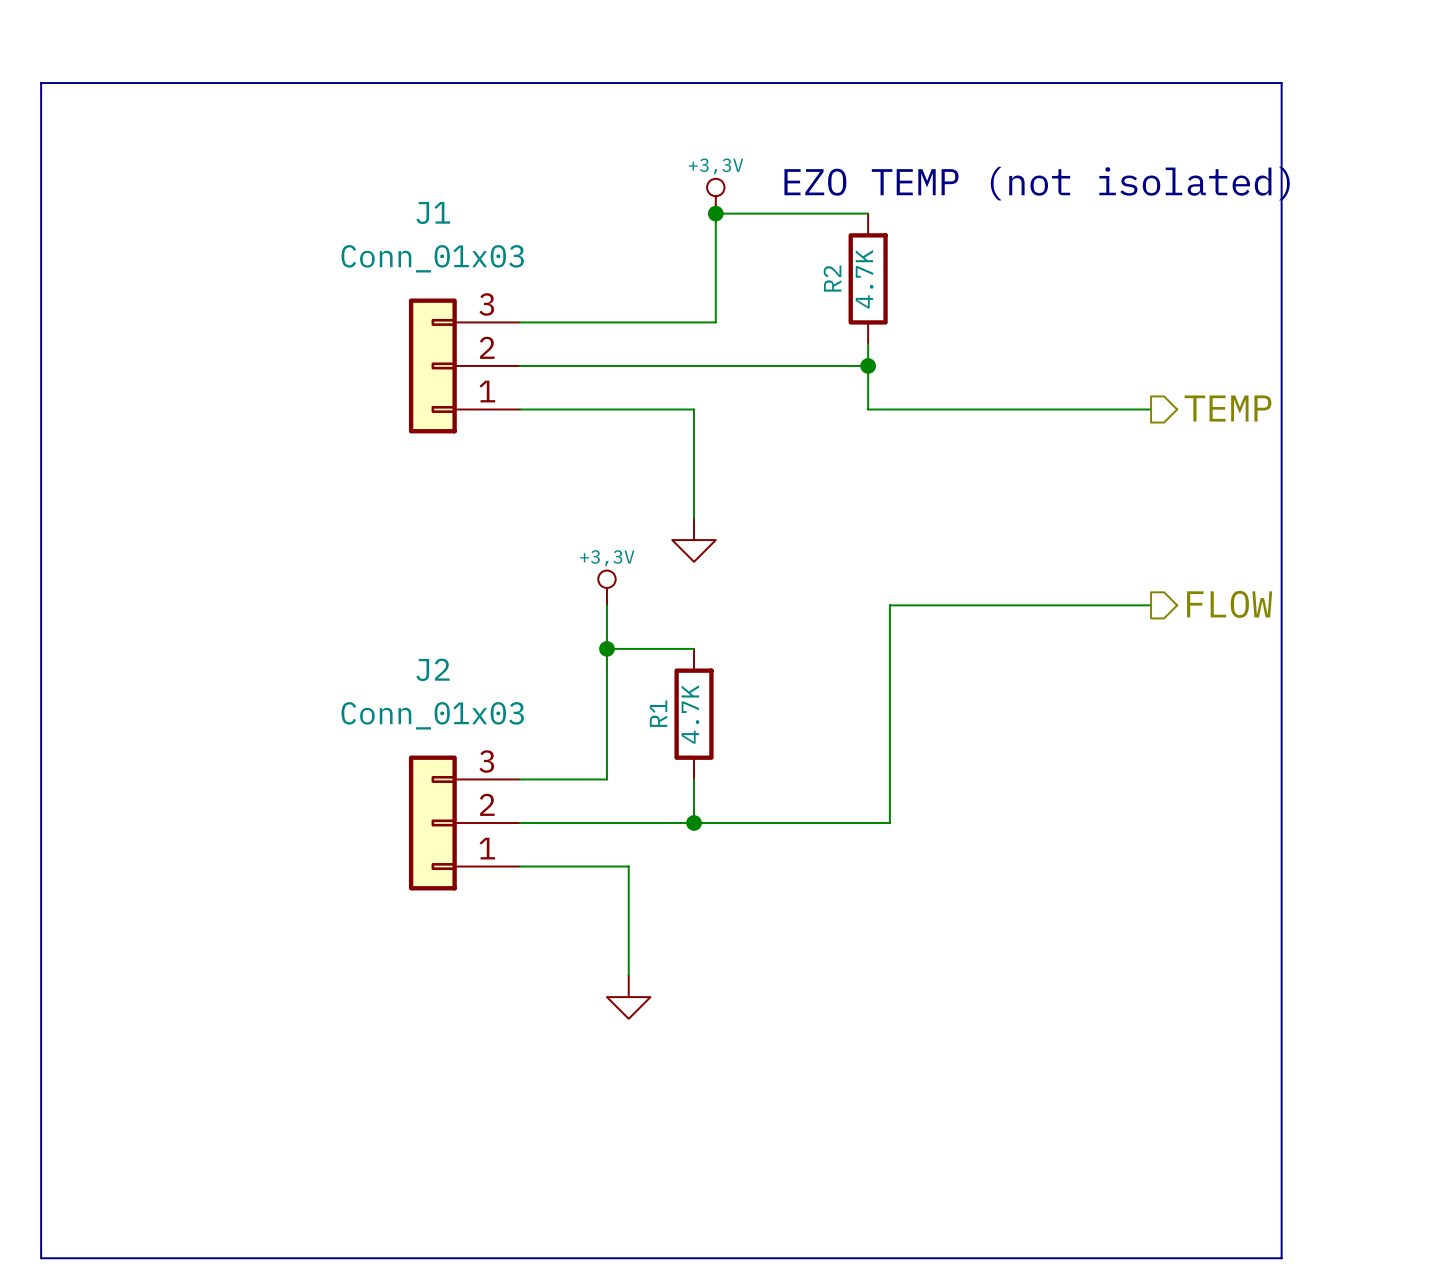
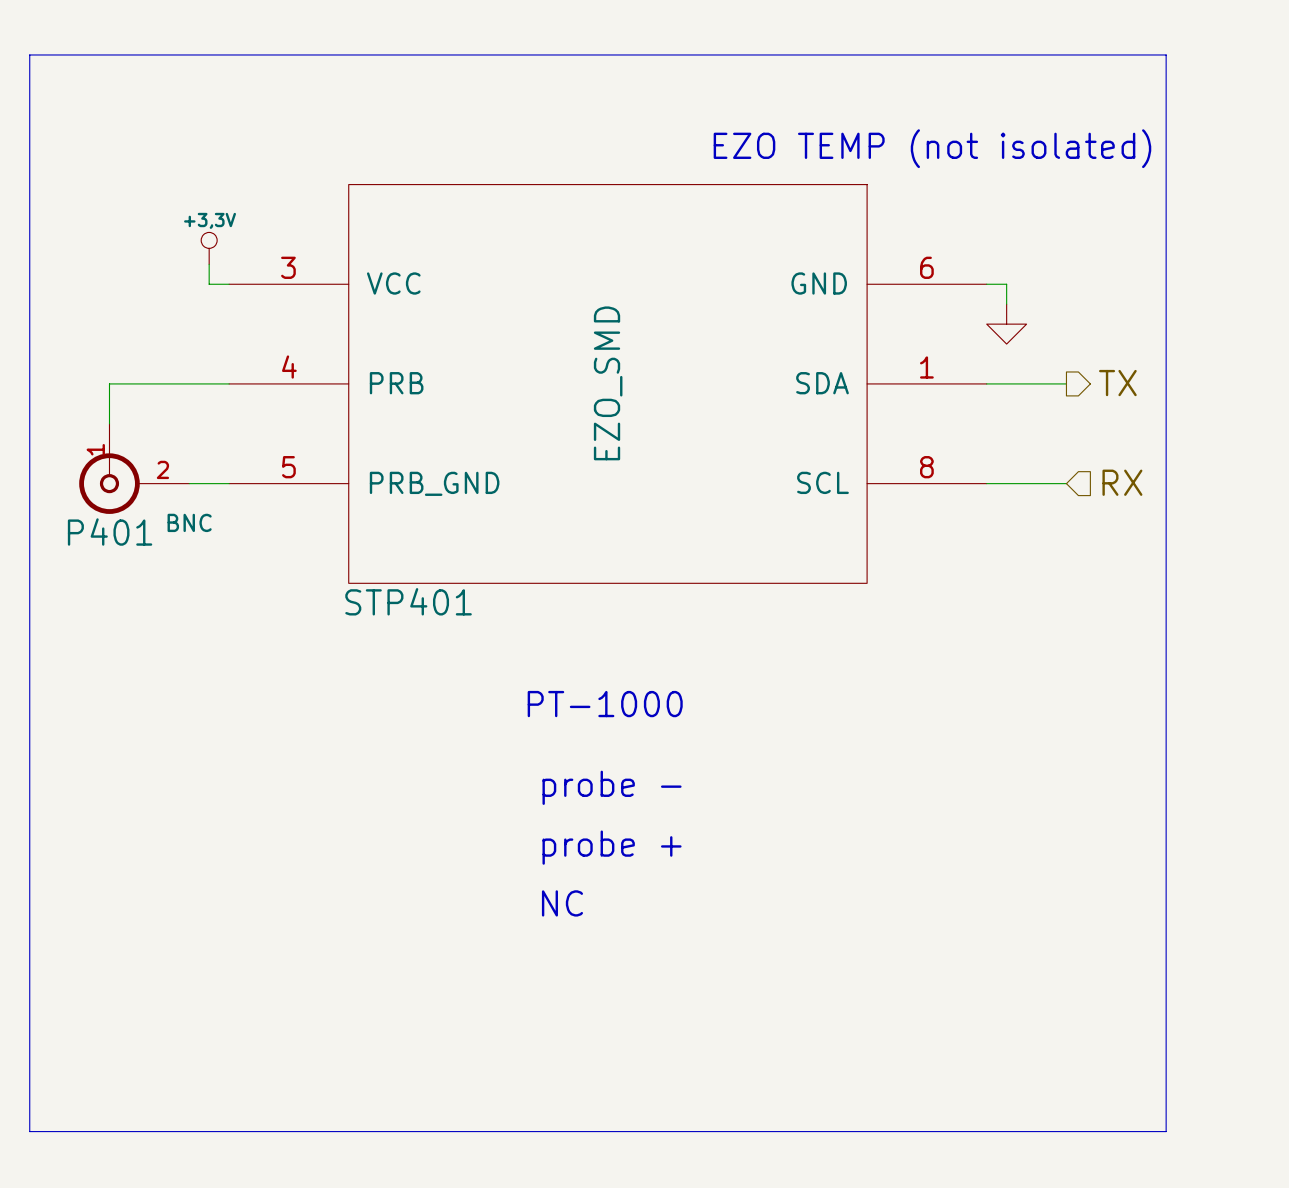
power symbol: +3,3V (715, 196) -> none
junction: (715, 213) -> none
wire: (868, 213) (715, 213) (715, 322) (519, 322) -> none
R2: 4.7K (868, 278) -> none
power symbol: none -> +3,3V (209, 248)
wire: none -> (209, 264) (209, 284) (229, 284)
wire: none -> (986, 284) (1006, 284) (1006, 304)
wire: (868, 344) (868, 409) (1151, 409) -> none
J1: Conn_01x03 (464, 365) -> none
wire: (519, 365) (868, 365) -> none
junction: (868, 365) -> none
power symbol: none -> (1006, 324)
hierarchical label: TEMP (1228, 408) -> none
wire: (519, 409) (694, 409) (694, 518) -> none
hierarchical label: none -> TX (1117, 383)
wire: none -> (229, 383) (109, 383) (109, 423)
STP401: none -> EZO_SMD (607, 383)
wire: none -> (986, 383) (1066, 383)
P401: none -> BNC (134, 468)
power symbol: (694, 540) -> none
hierarchical label: none -> RX (1122, 482)
wire: none -> (189, 483) (229, 483)
wire: none -> (986, 483) (1066, 483)
power symbol: +3,3V (606, 587) -> none
hierarchical label: FLOW (1229, 604) -> none
wire: (606, 605) (606, 779) (519, 779) -> none
wire: (1151, 605) (889, 605) (889, 822) (519, 822) -> none
wire: (606, 648) (694, 648) -> none
junction: (606, 648) -> none
R1: 4.7K (694, 714) -> none
wire: (694, 779) (694, 822) -> none
text: none -> PT-1000 (605, 704)
J2: Conn_01x03 (464, 822) -> none
junction: (694, 822) -> none
wire: (519, 866) (628, 866) (628, 975) -> none
text: none -> probe - (612, 787)
text: none -> probe + (612, 847)
power symbol: (628, 997) -> none
text: none -> NC (562, 903)

